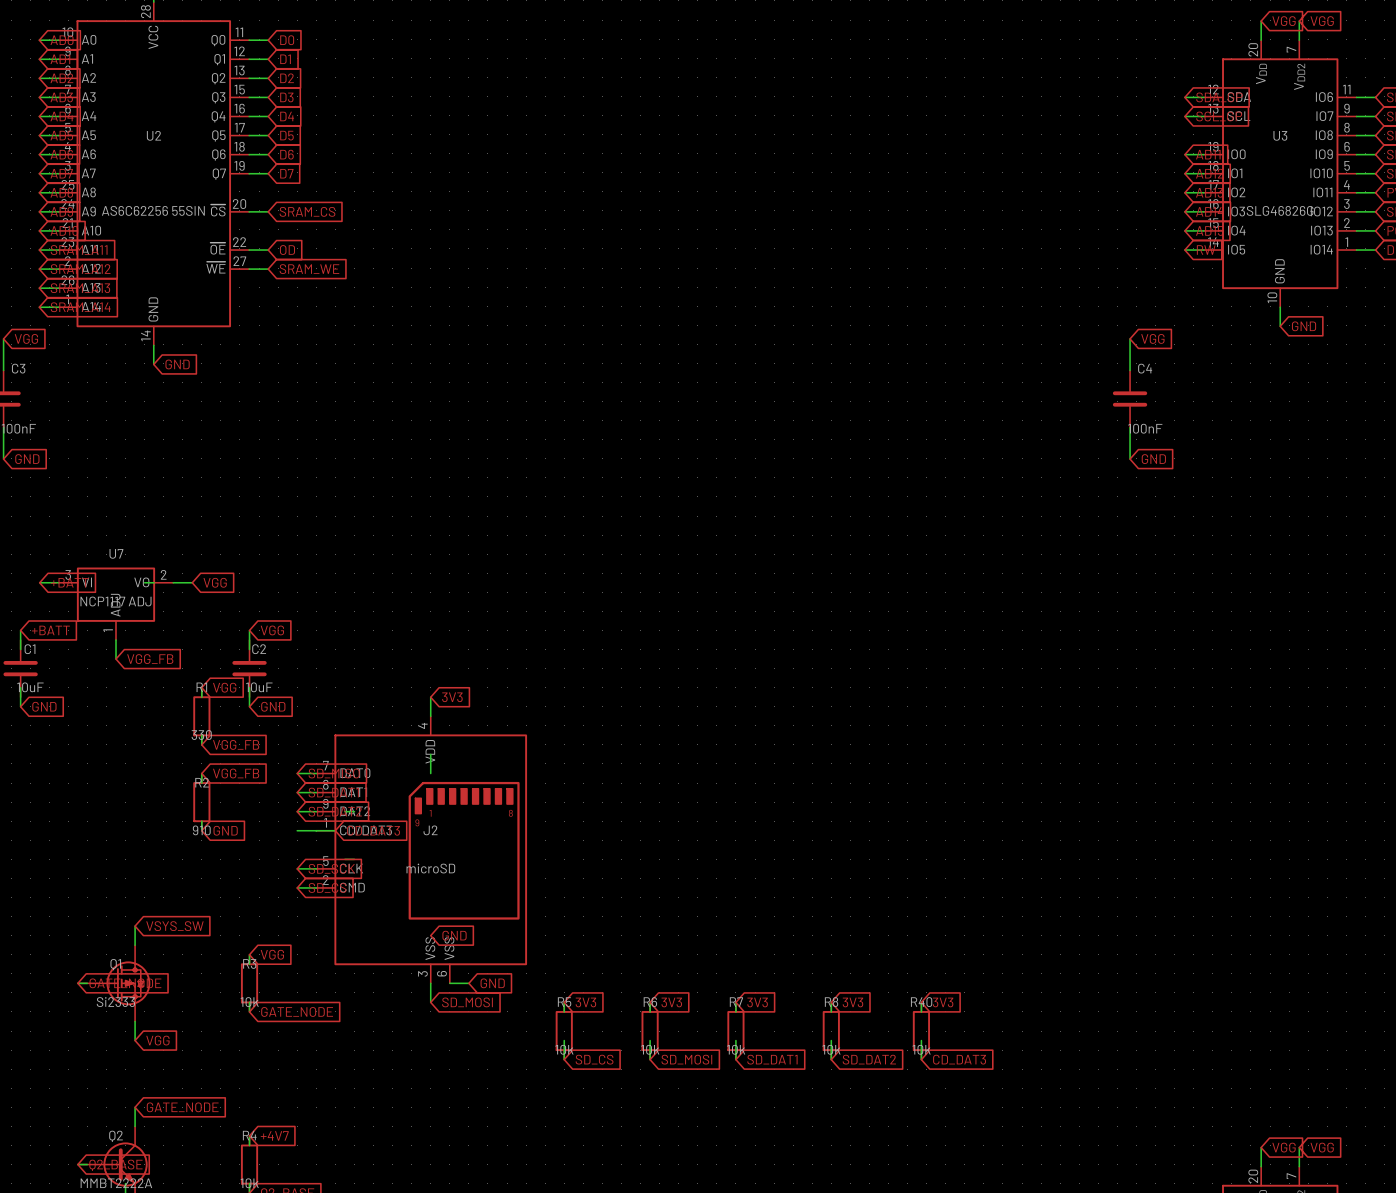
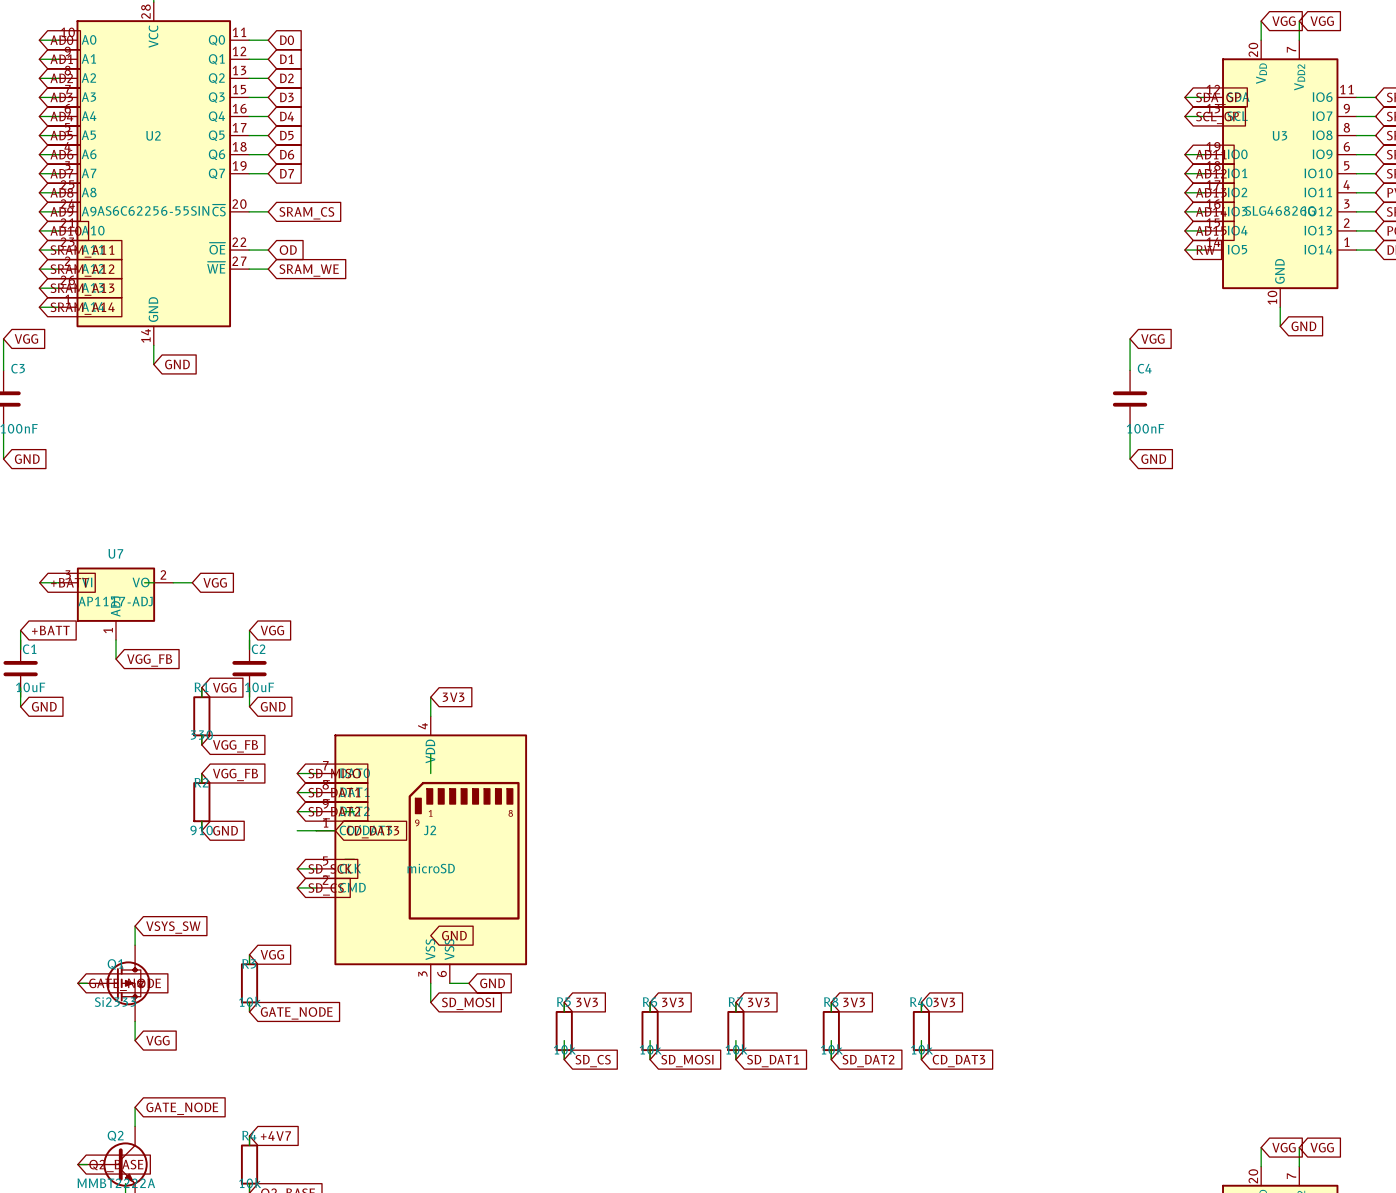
U2 value: AS6C62256 55SIN (153, 210) -> AS6C62256-55SIN (153, 210)
U7 value: NCP1117 ADJ (116, 601) -> AP1117-ADJ (115, 601)

